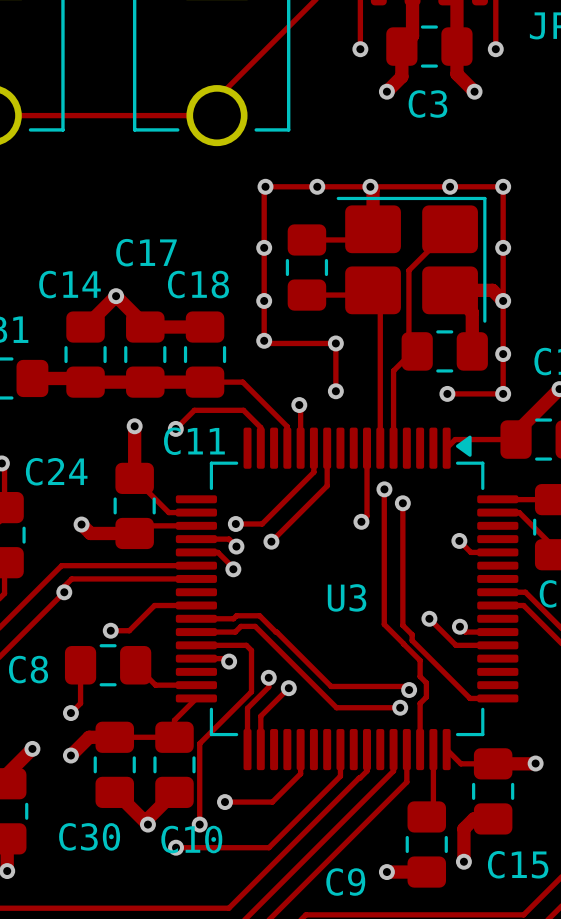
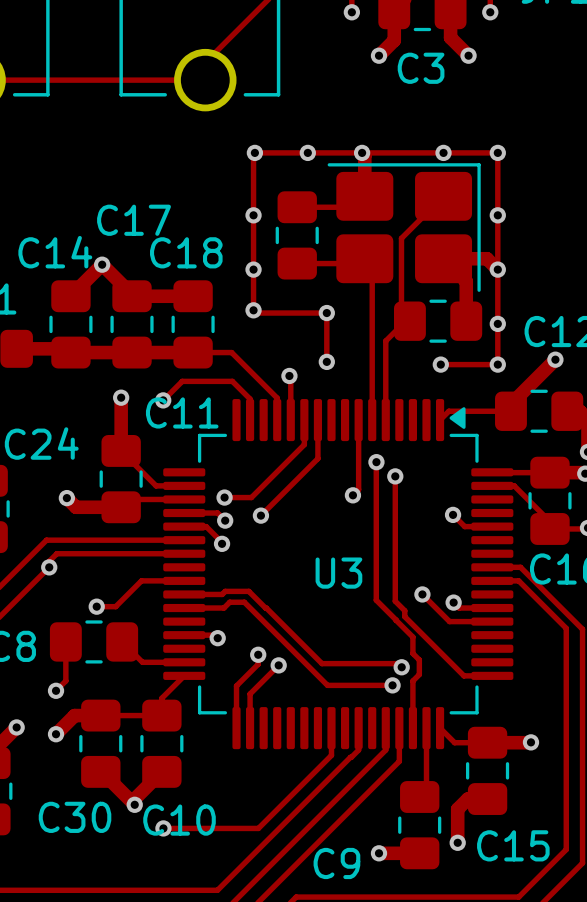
track: (196, 645) (246, 645) (251, 650) (251, 691) (199, 743) (199, 824) -> none
track: (300, 749) (300, 773) (272, 802) (224, 802) -> none
via: (224, 802) -> none
via: (199, 824) -> none

